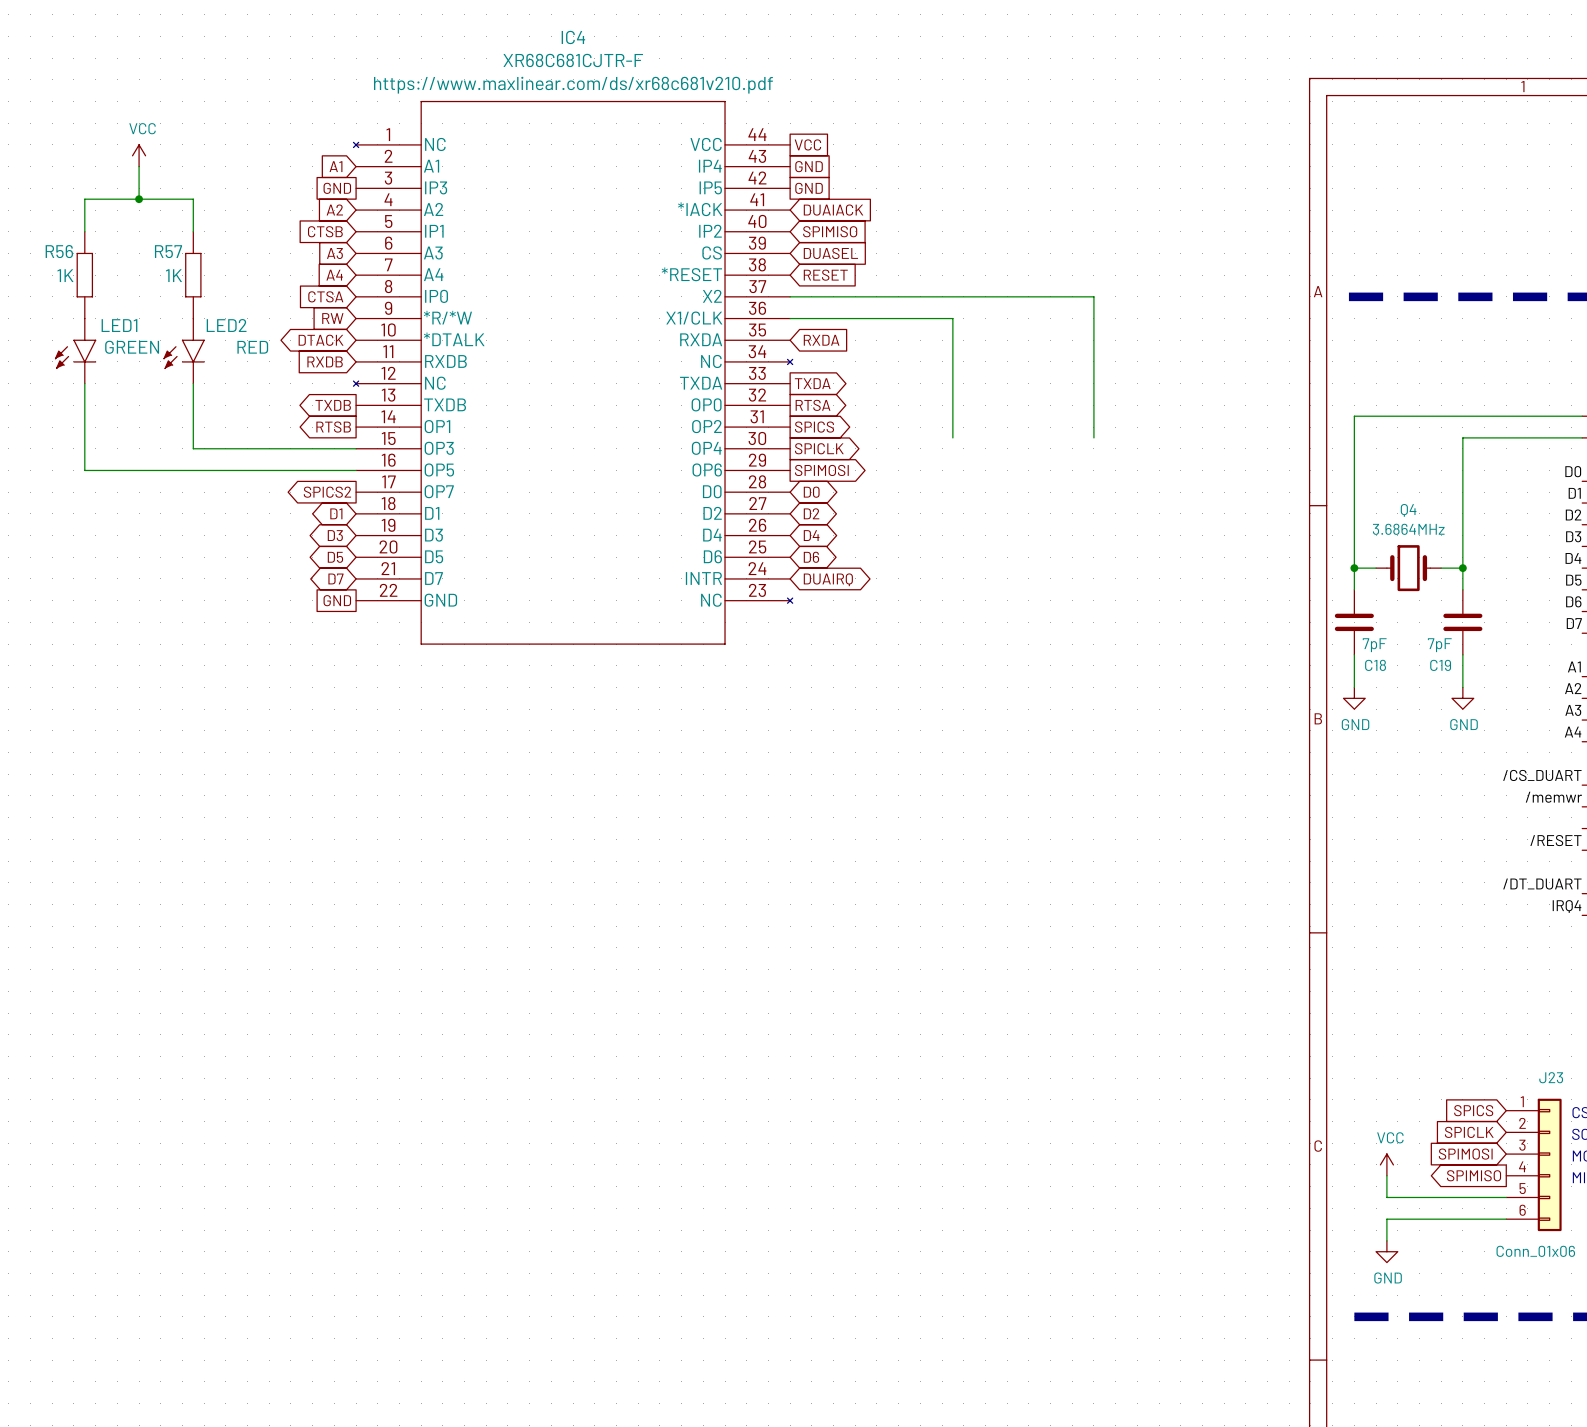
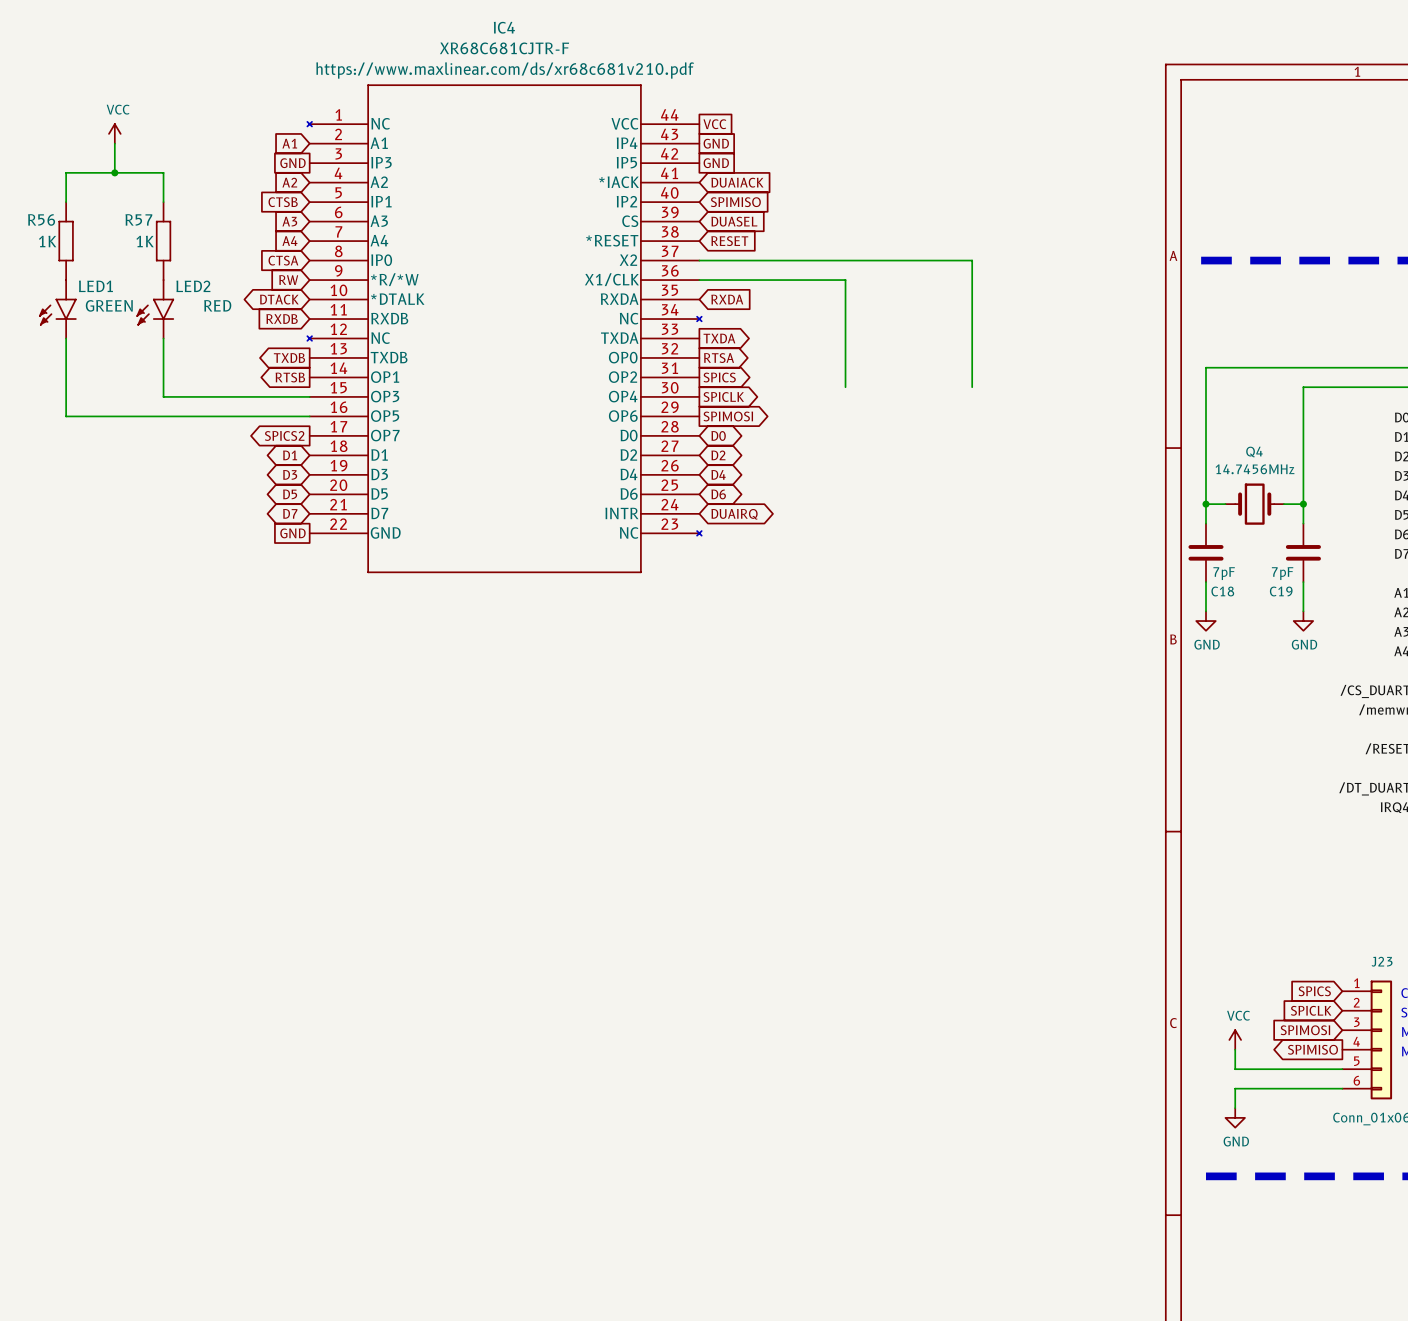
Q4 value: 3.6864MHz (1408, 529) -> 14.7456MHz (1255, 469)

